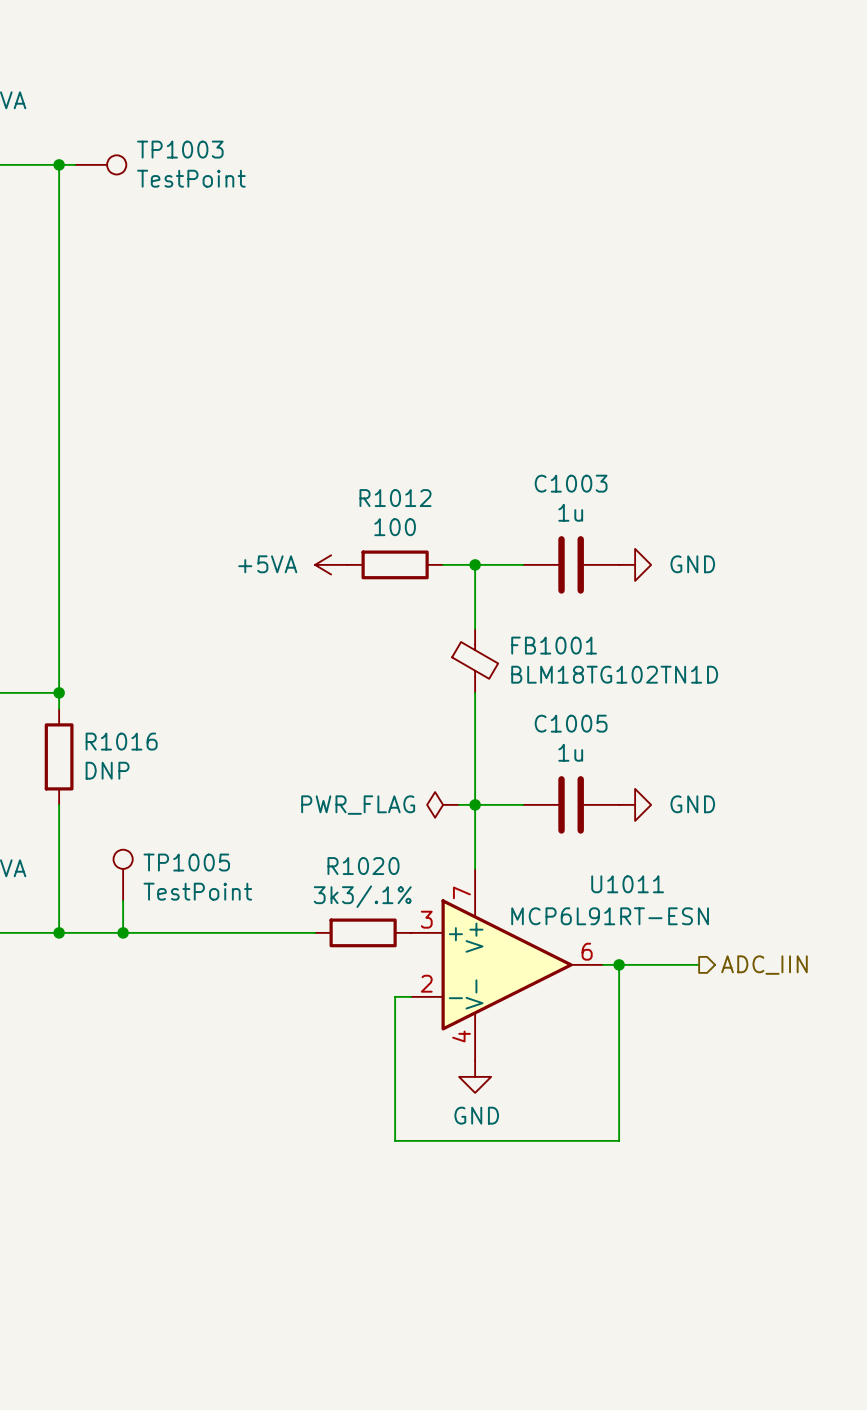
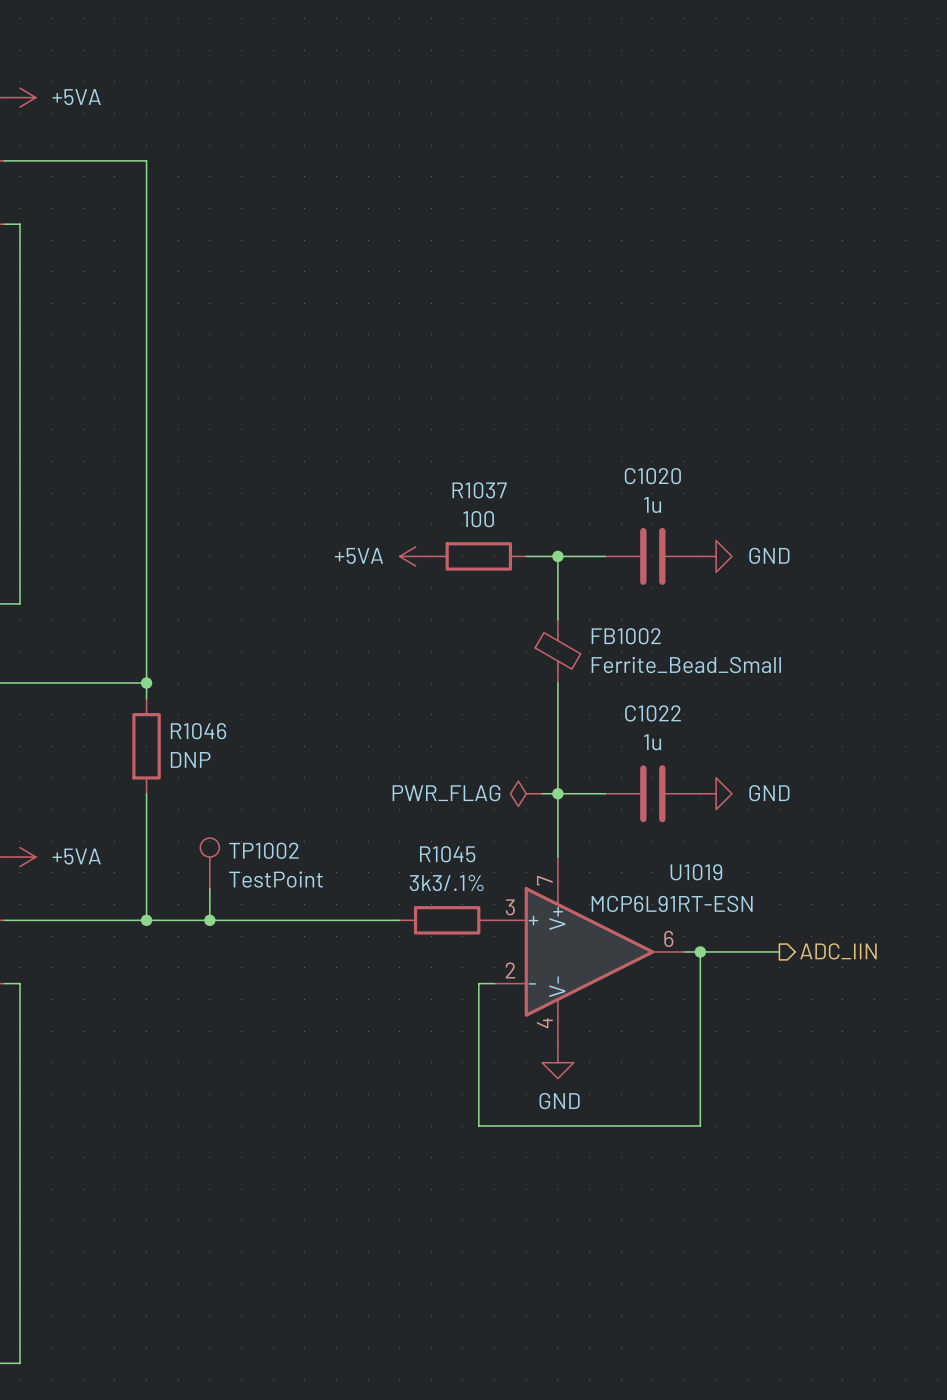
wire: (59, 164) (75, 164) -> none
junction: (59, 164) -> none
TP1003: TestPoint (100, 164) -> none
C1003 name: C1003 (571, 483) -> C1020 (652, 476)
R1012 name: R1012 (395, 498) -> R1037 (479, 490)
FB1001 name: FB1001 (554, 645) -> FB1002 (626, 636)
FB1001 value: BLM18TG102TN1D (614, 674) -> Ferrite_Bead_Small (686, 665)
C1005 name: C1005 (571, 723) -> C1022 (653, 713)
R1016 name: R1016 (121, 741) -> R1046 (198, 731)
TP1005 name: TP1005 (186, 862) -> TP1002 (263, 850)
R1020 name: R1020 (363, 866) -> R1045 (447, 854)
U1011 name: U1011 (627, 884) -> U1019 (696, 872)

